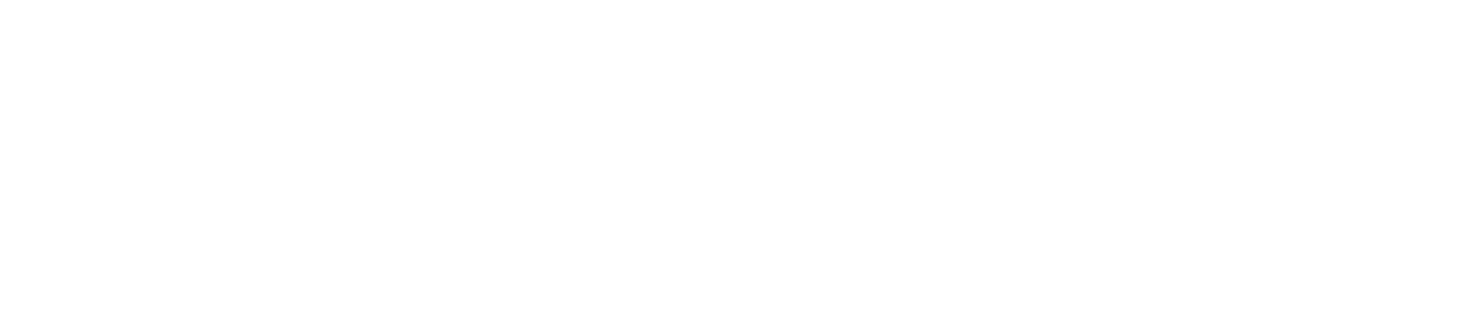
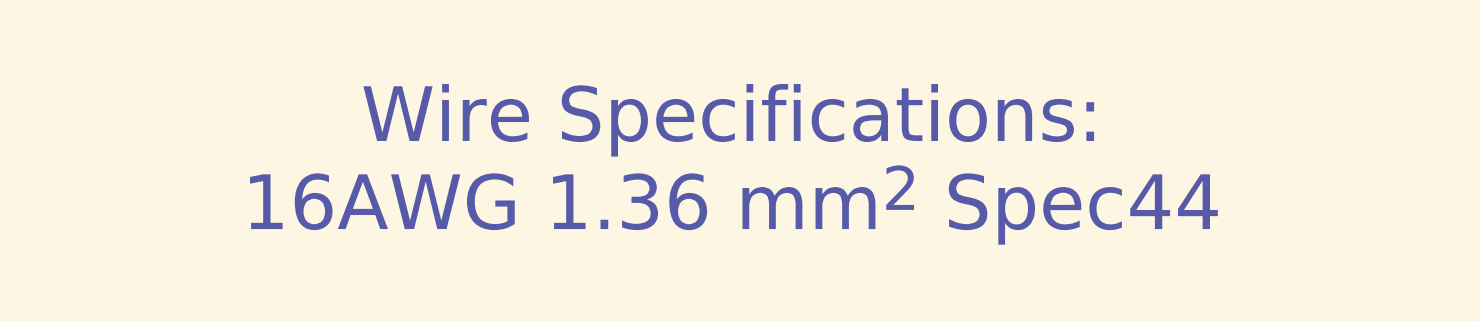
text: none -> Wire Specifications: (728, 120)
text: none -> 16AWG 1.36 mm2 Spec44 (733, 205)

